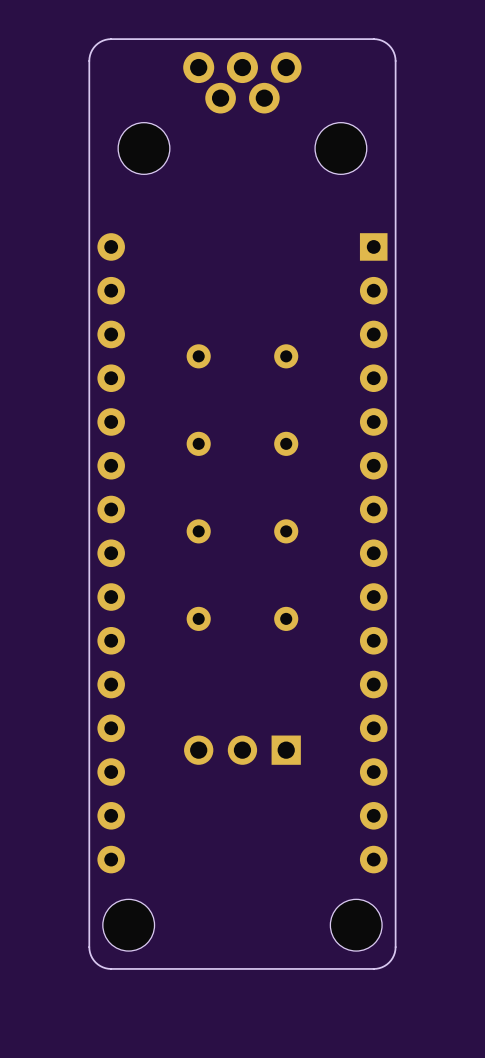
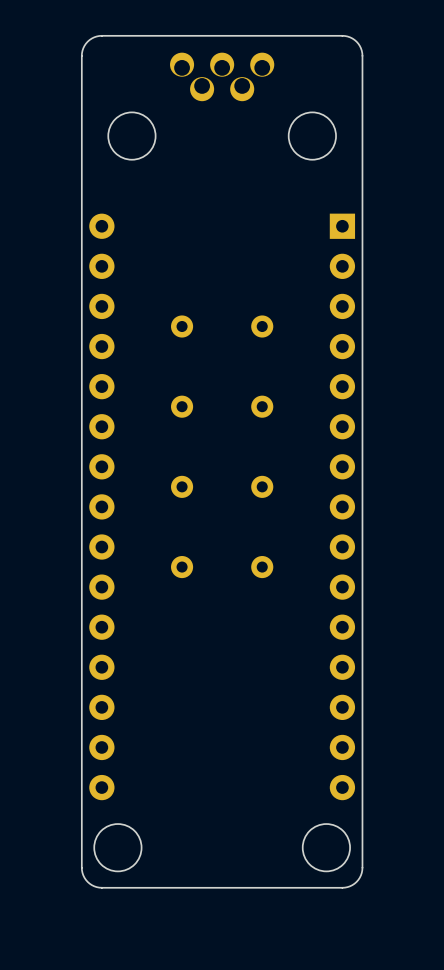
part footprint: [183, 52, 302, 114] -> [170, 52, 275, 102]
part: (242, 750) -> none

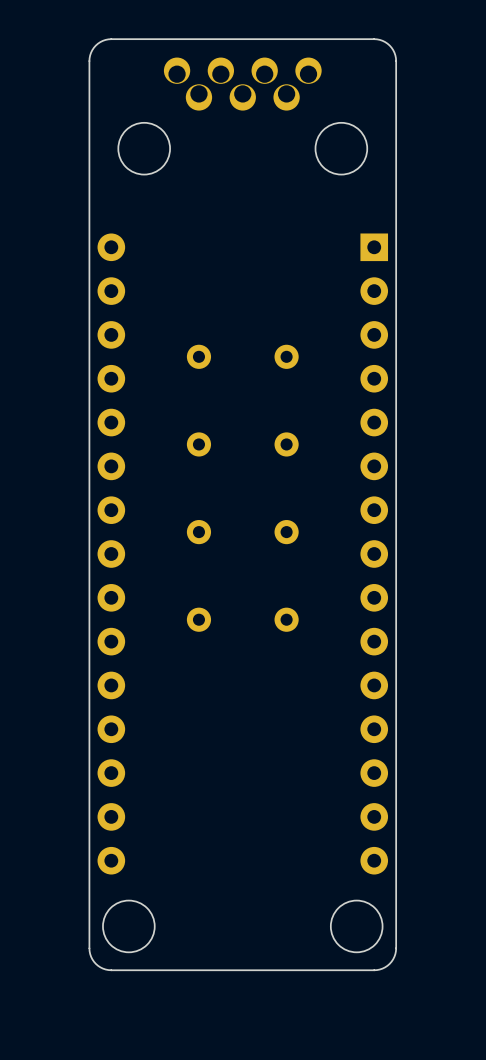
part: none -> (177, 70)
part: none -> (308, 70)
part rotation: 0° (222, 76) -> 180° (242, 84)

